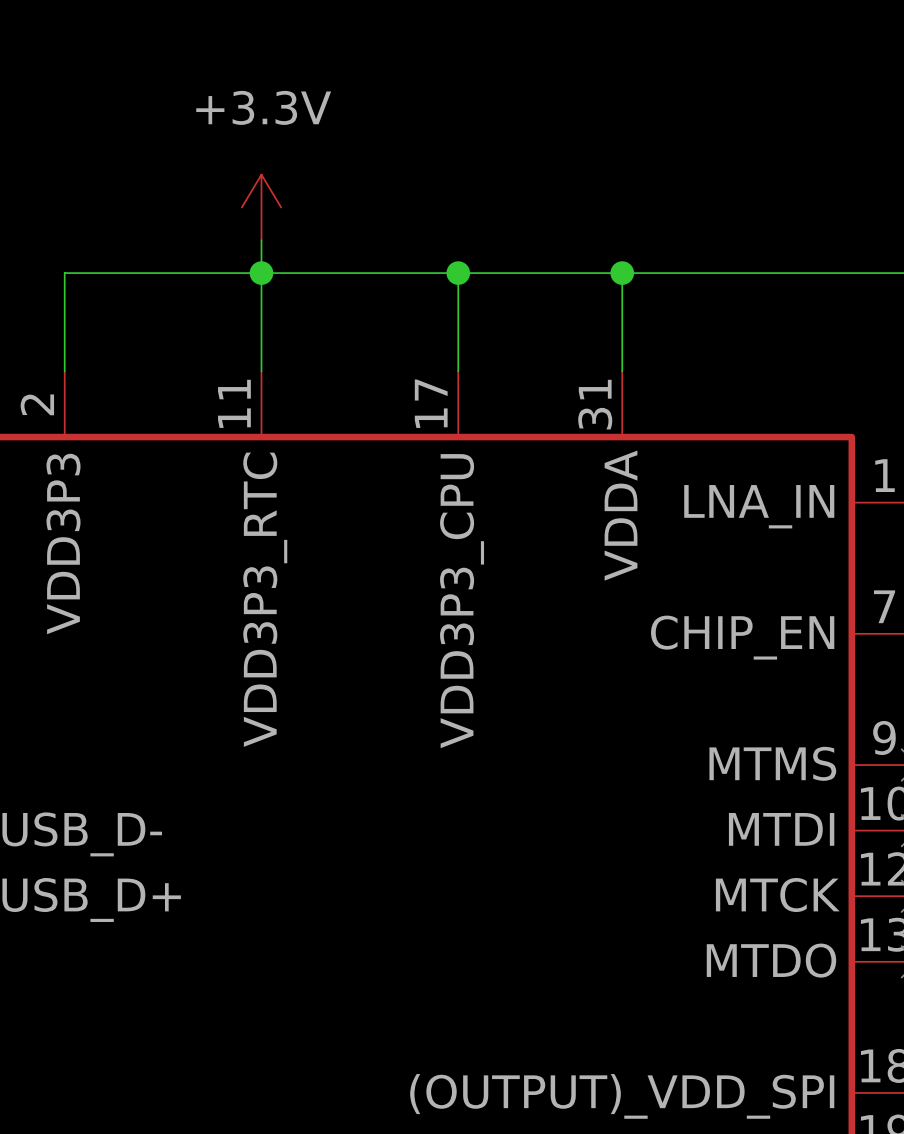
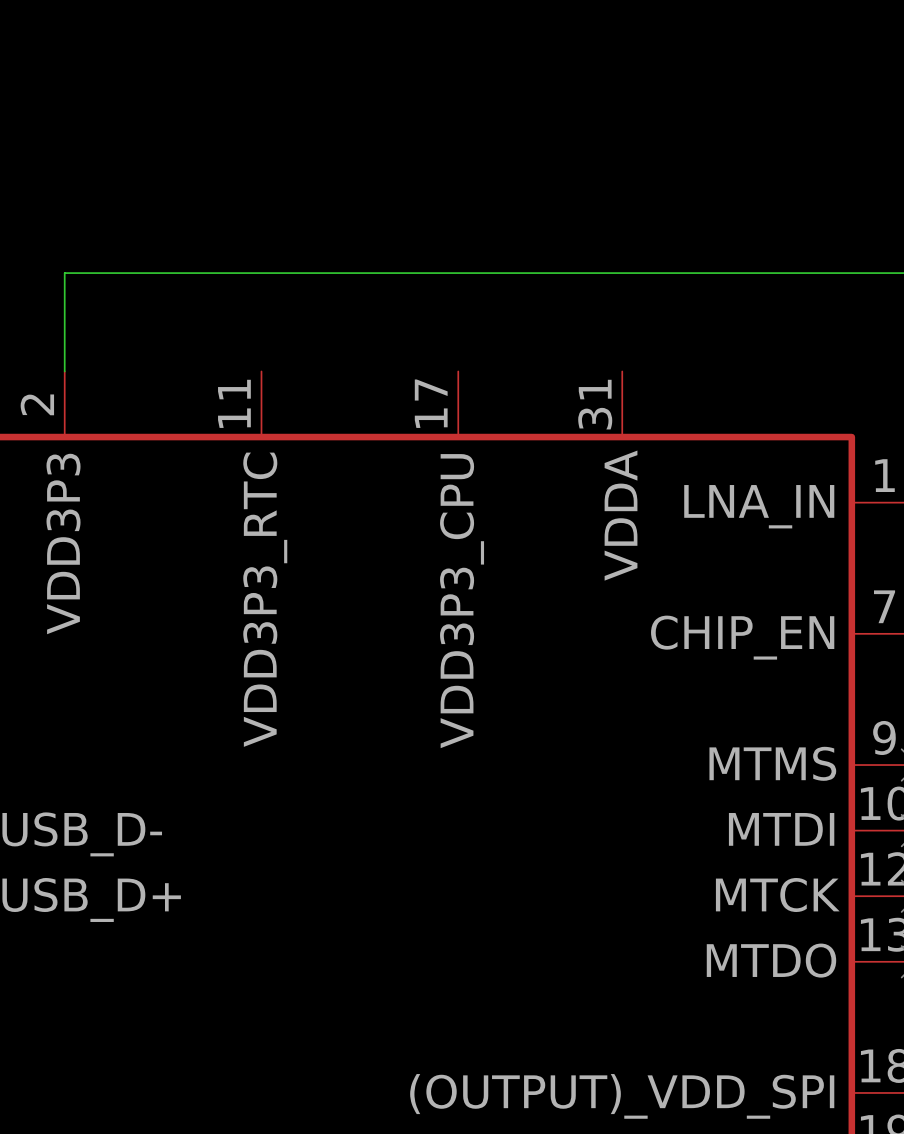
power symbol: +3.3V (261, 207) -> none
wire: (261, 240) (261, 371) -> none
junction: (261, 273) -> none
wire: (458, 273) (458, 371) -> none
junction: (458, 273) -> none
wire: (622, 273) (622, 371) -> none
junction: (622, 273) -> none

